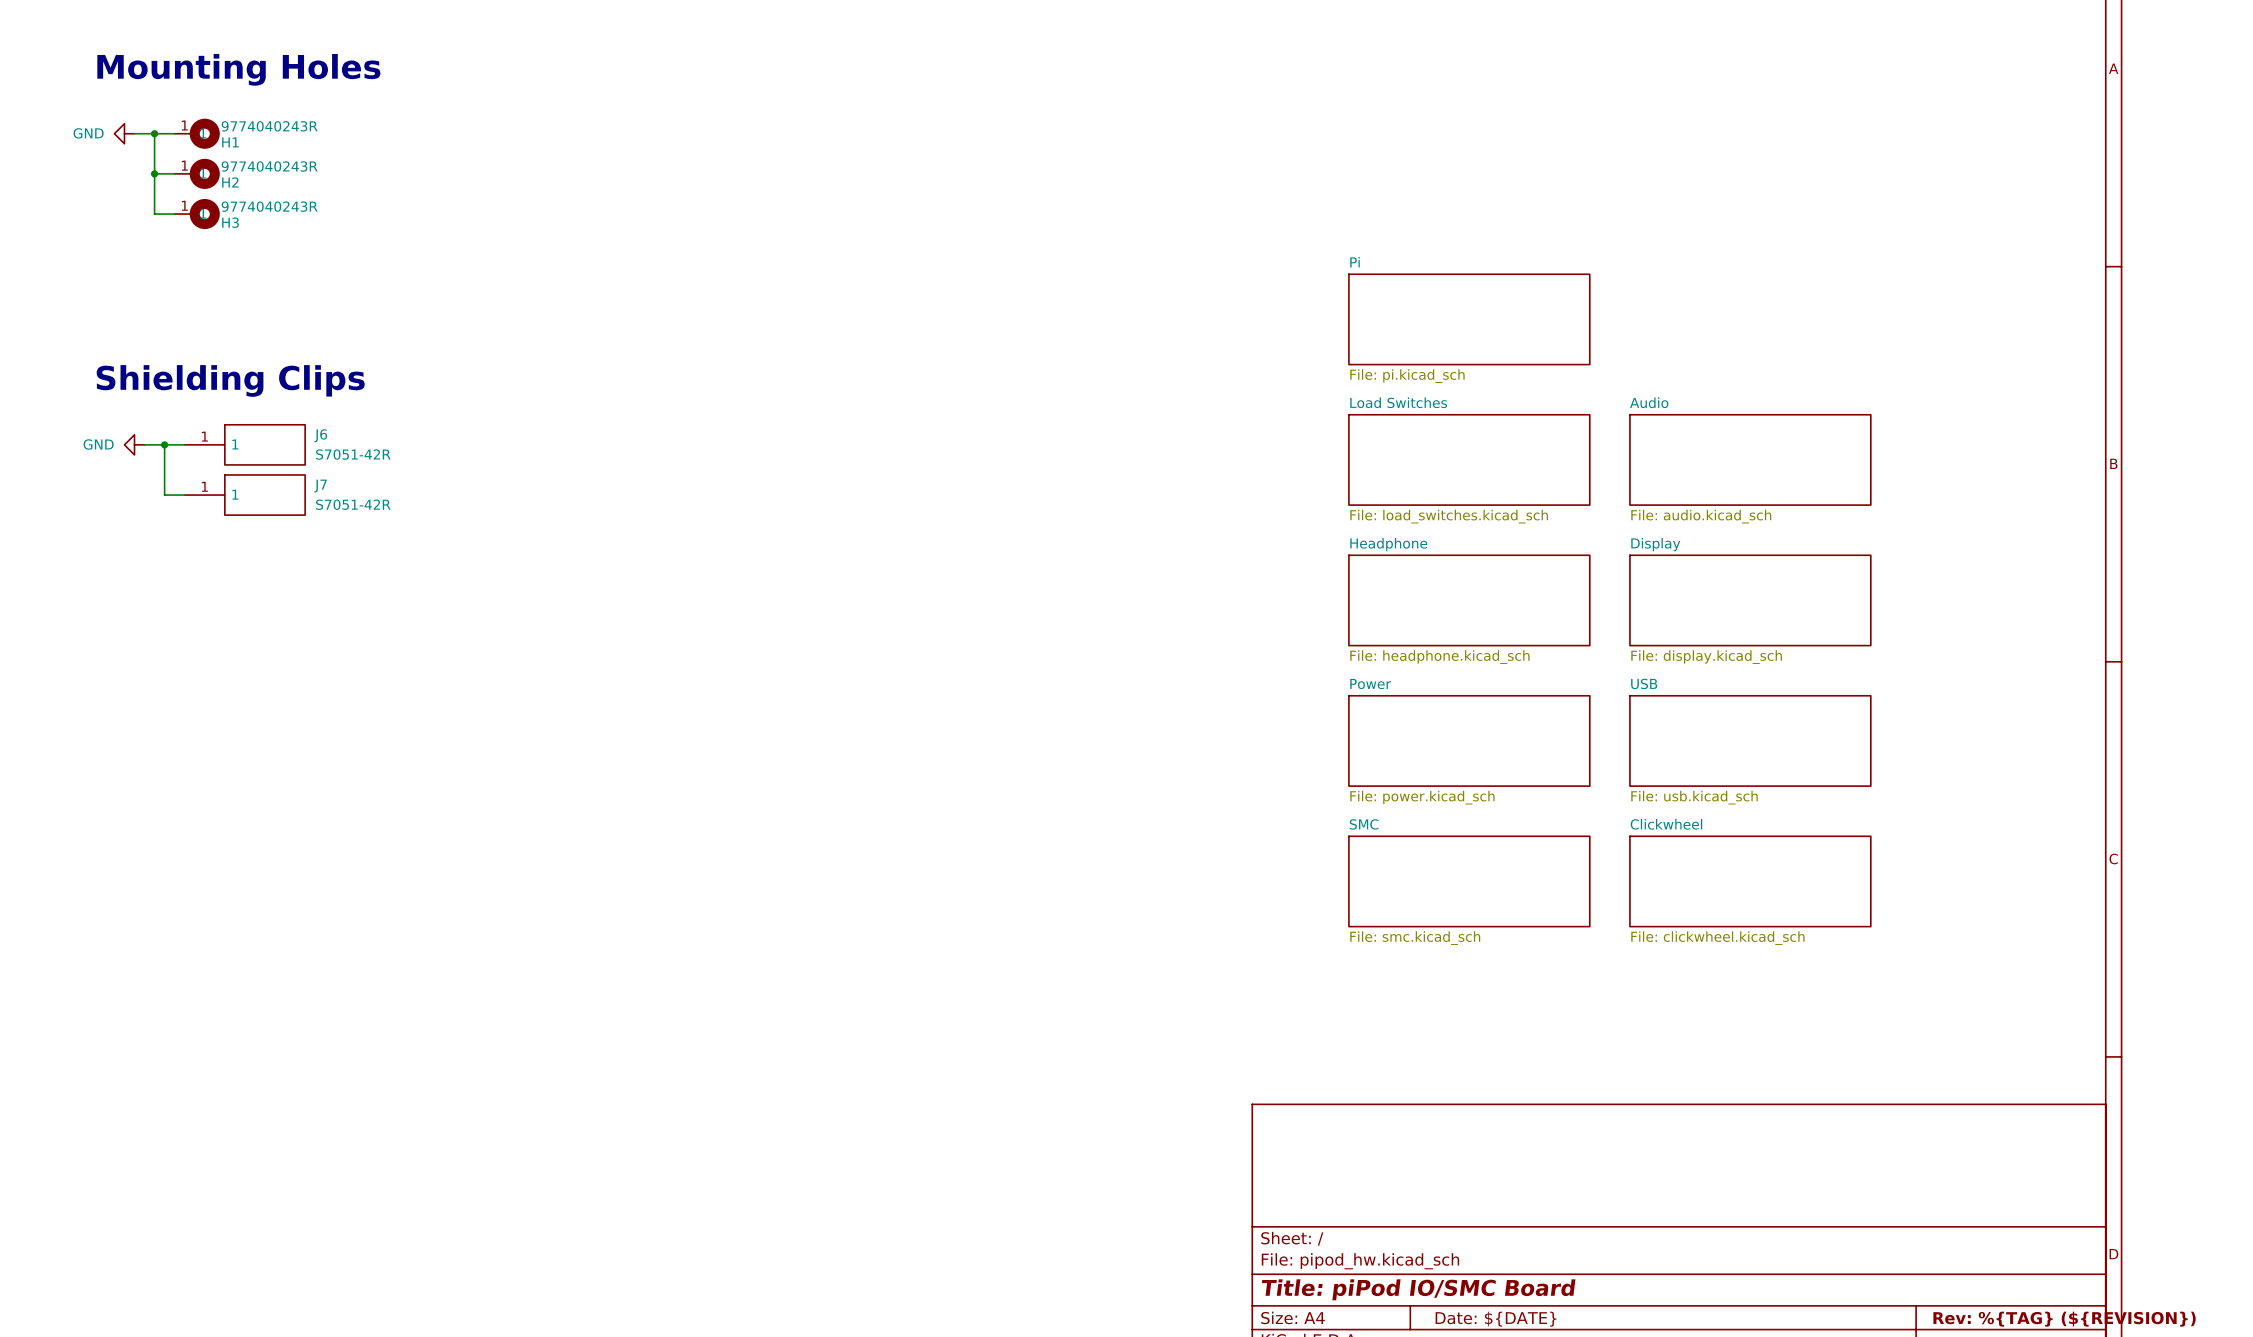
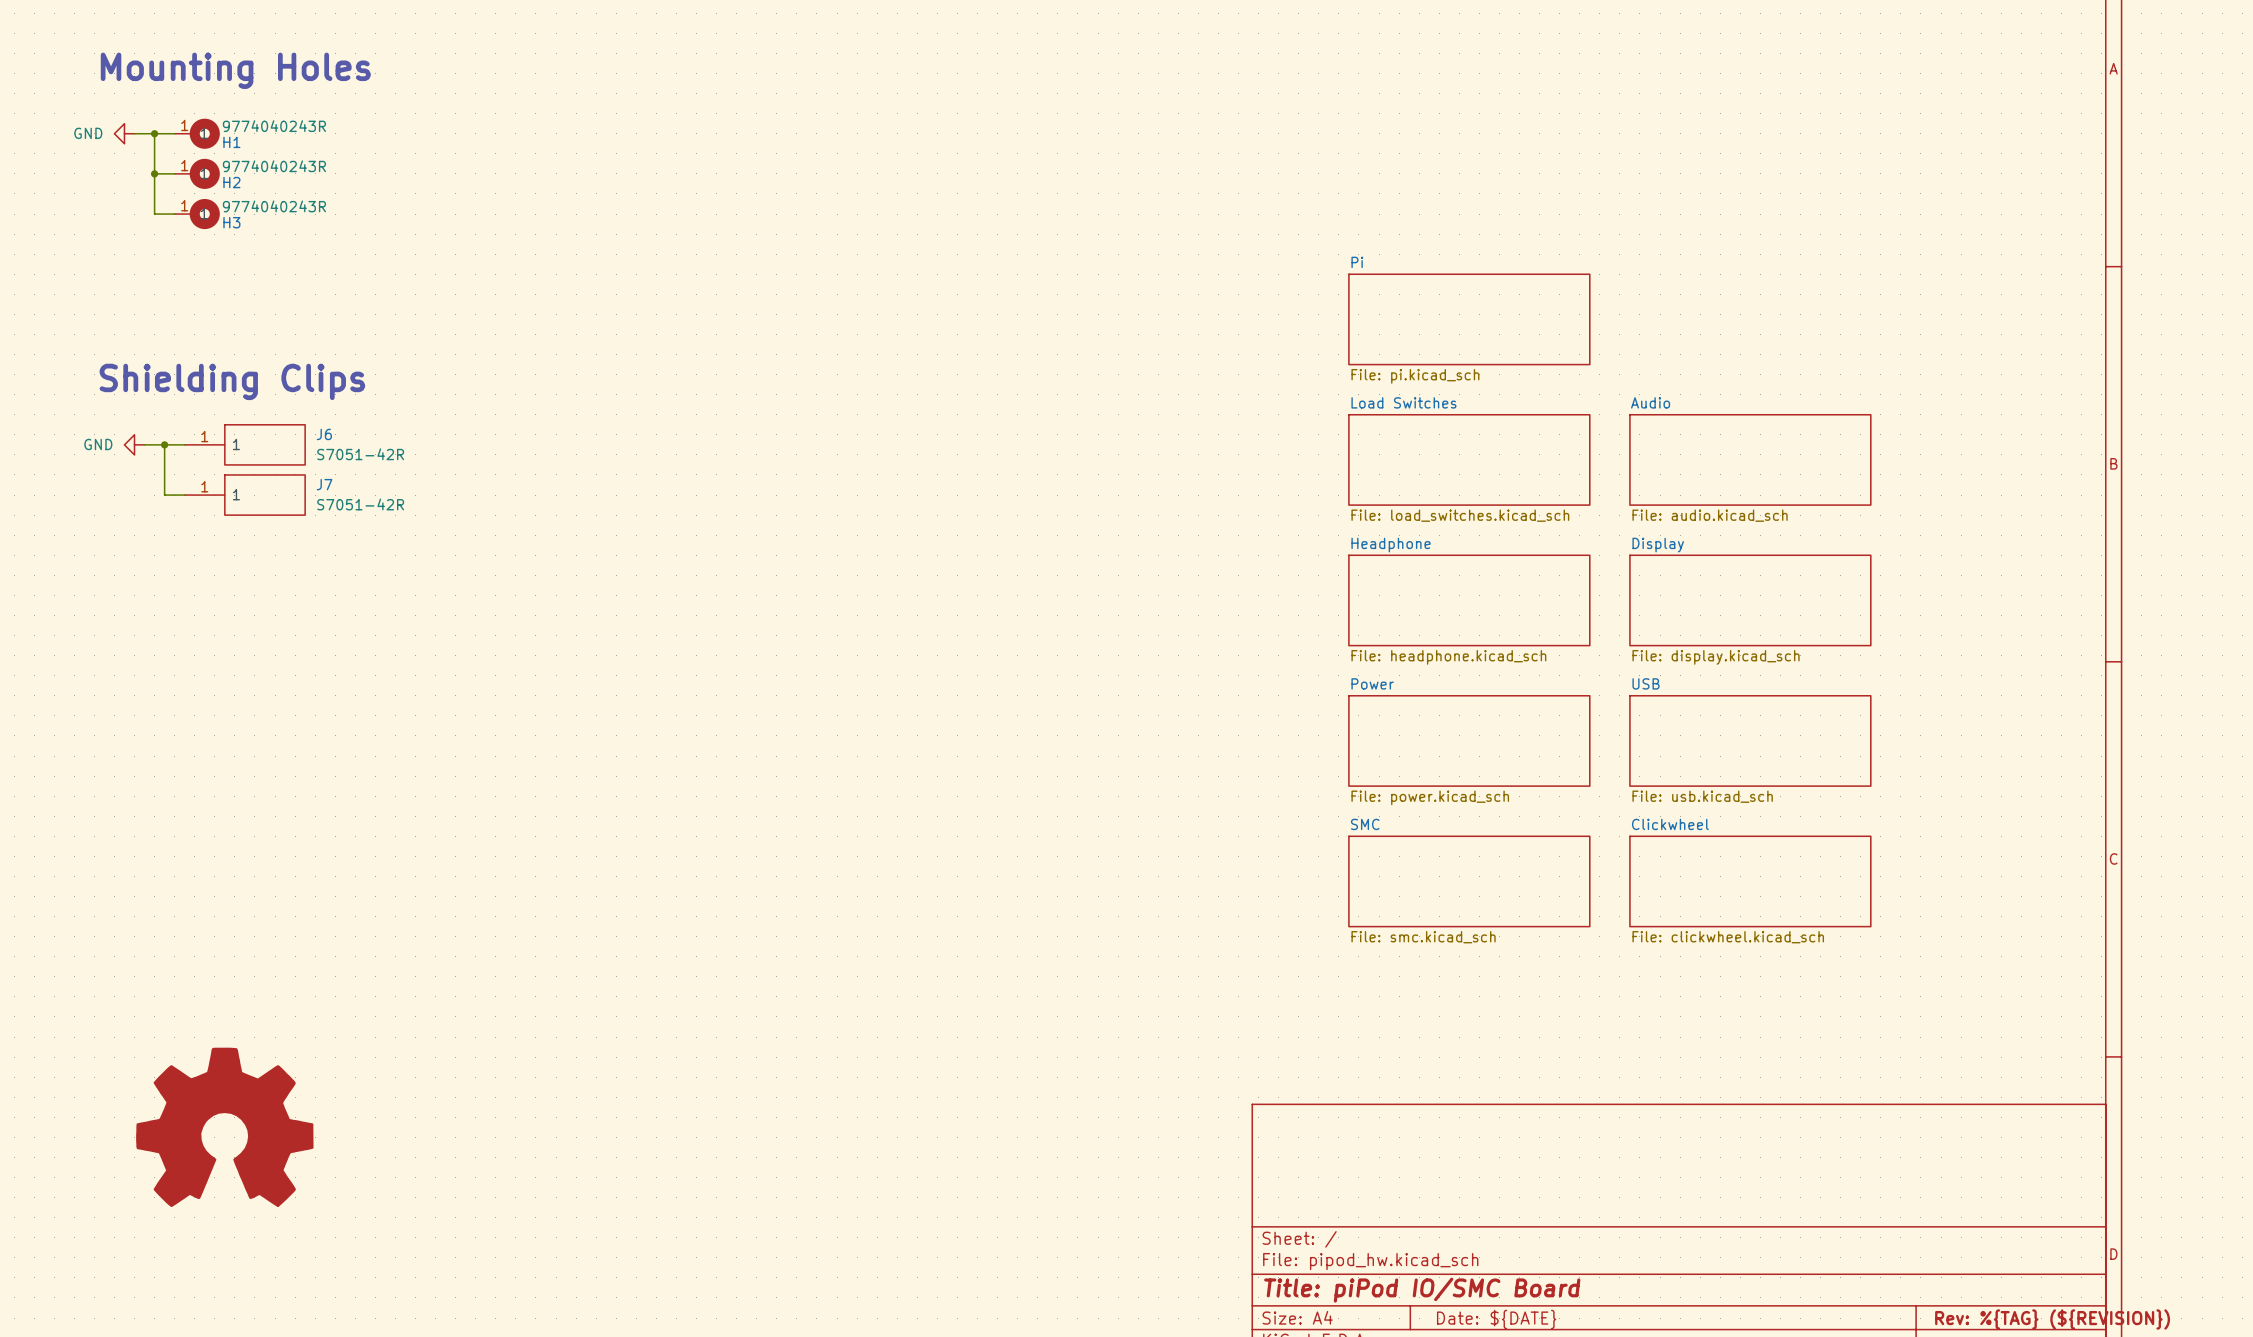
part: none -> (224, 1127)

